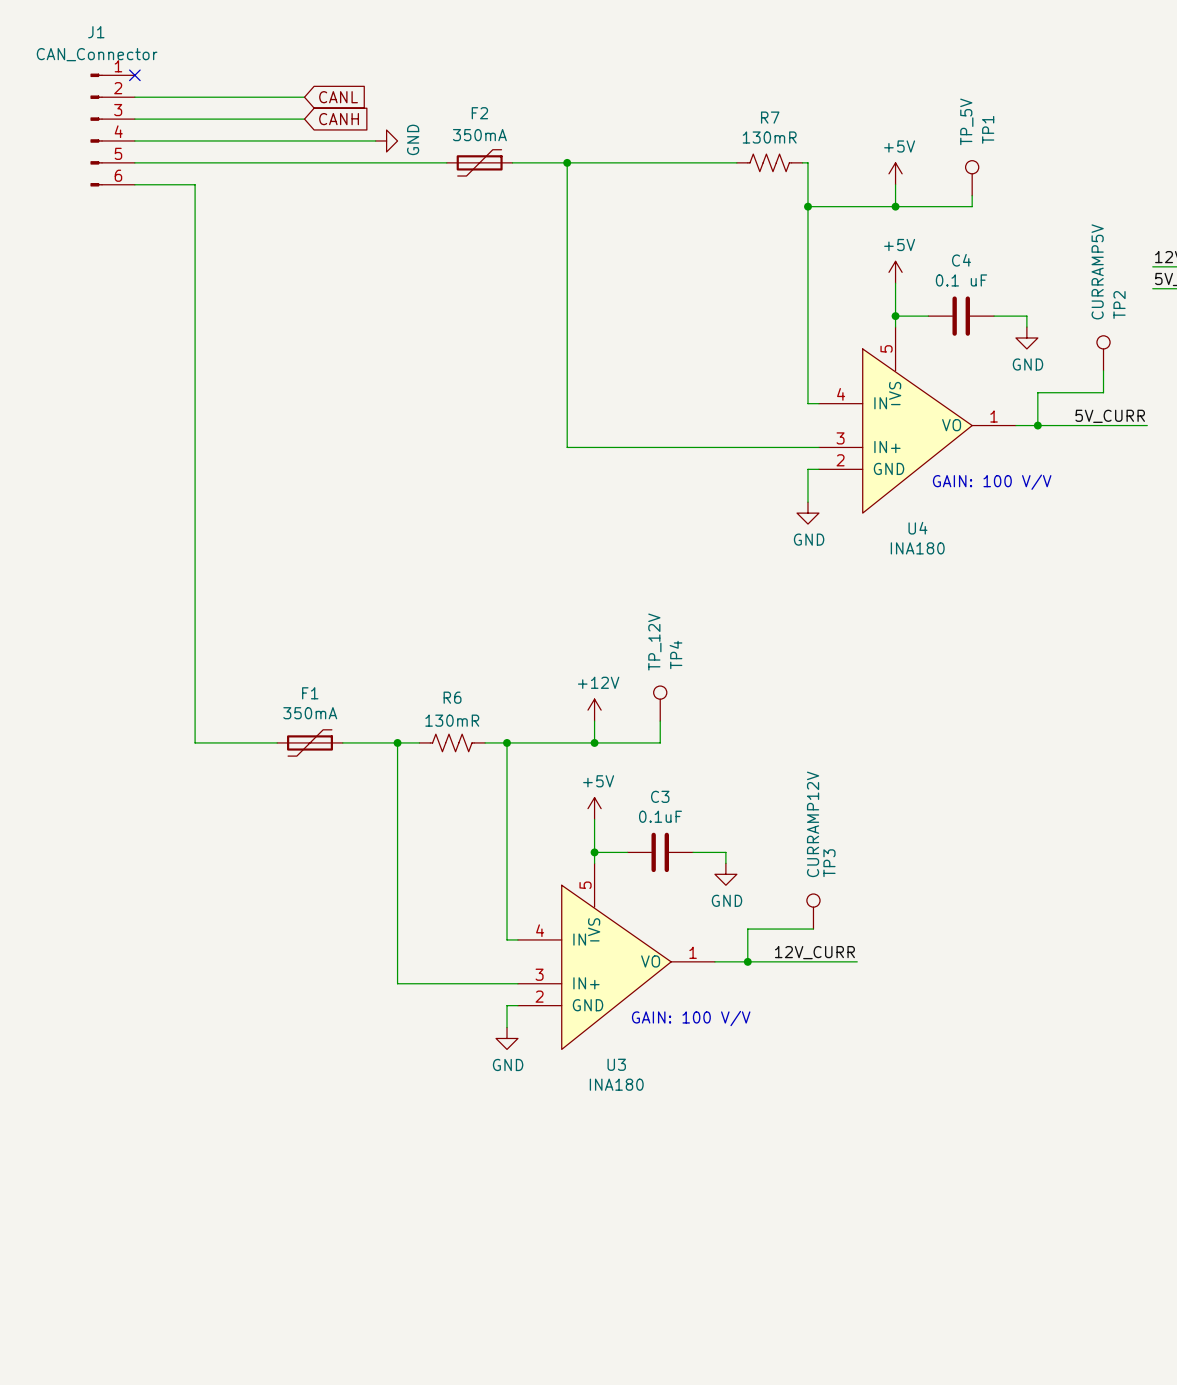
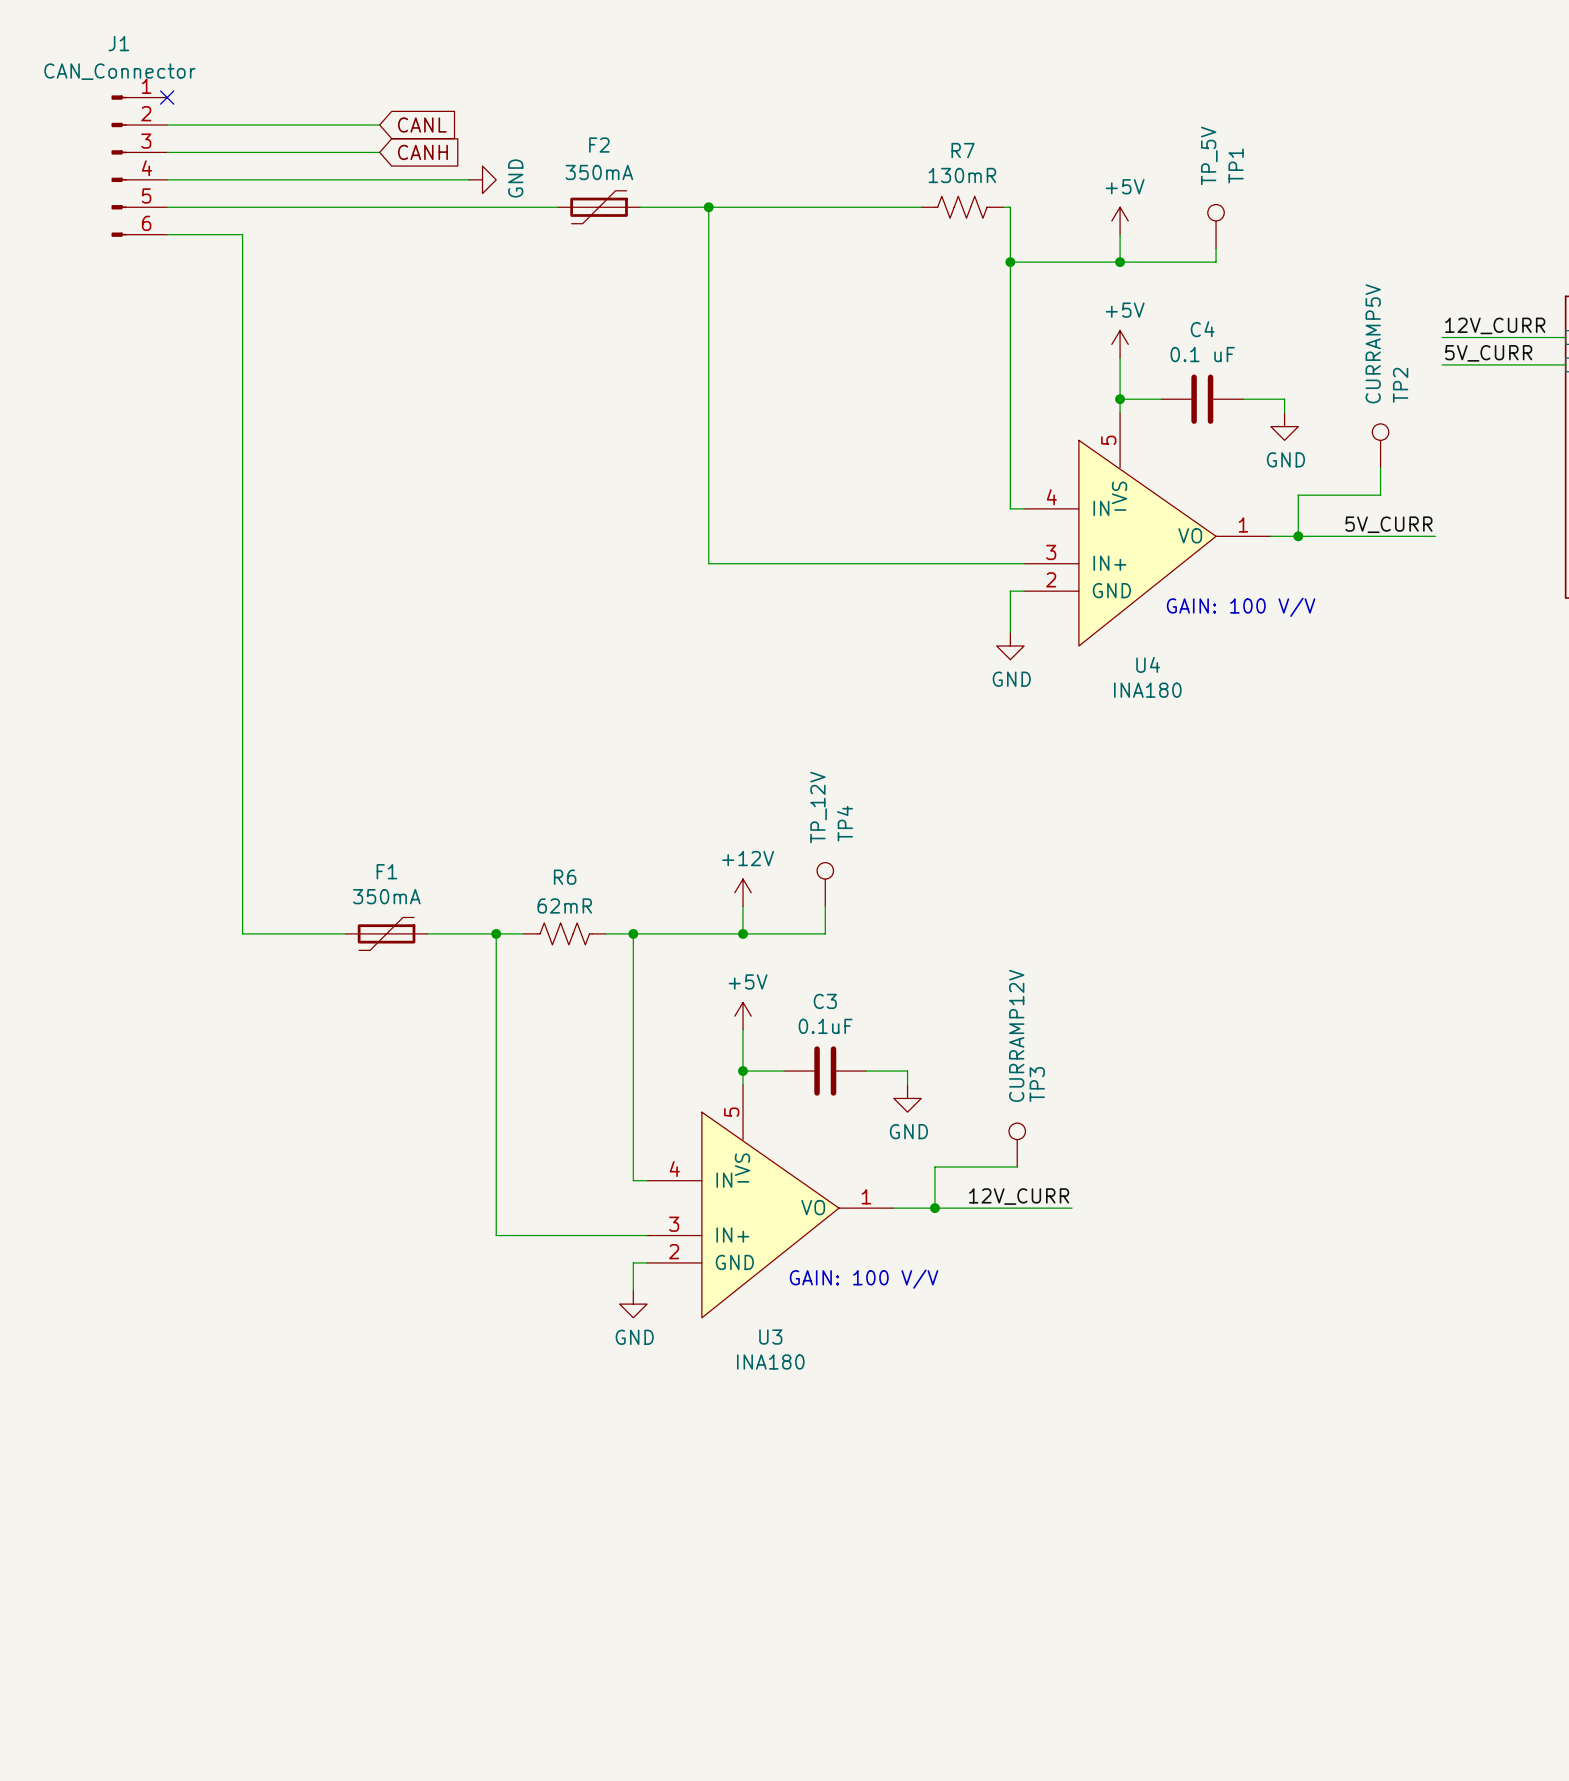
R6 value: 130mR (452, 720) -> 62mR (564, 905)

